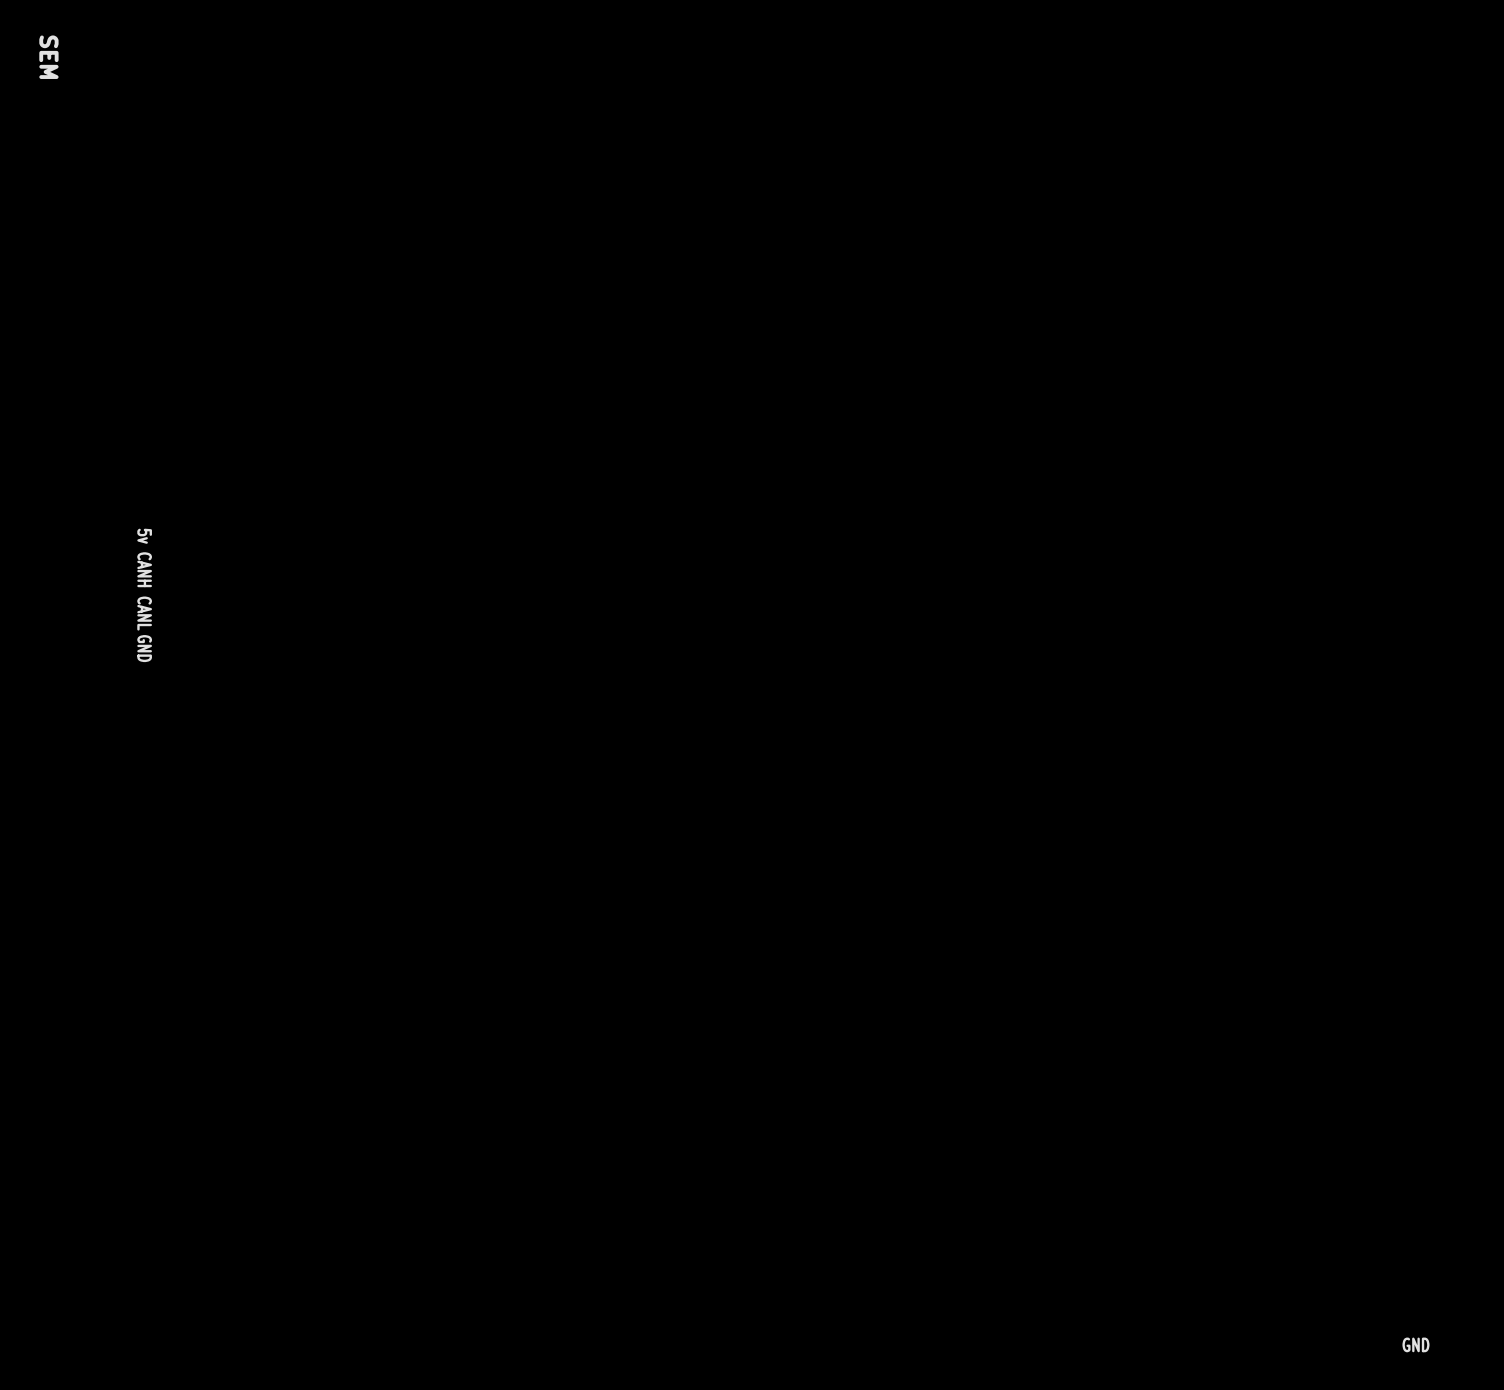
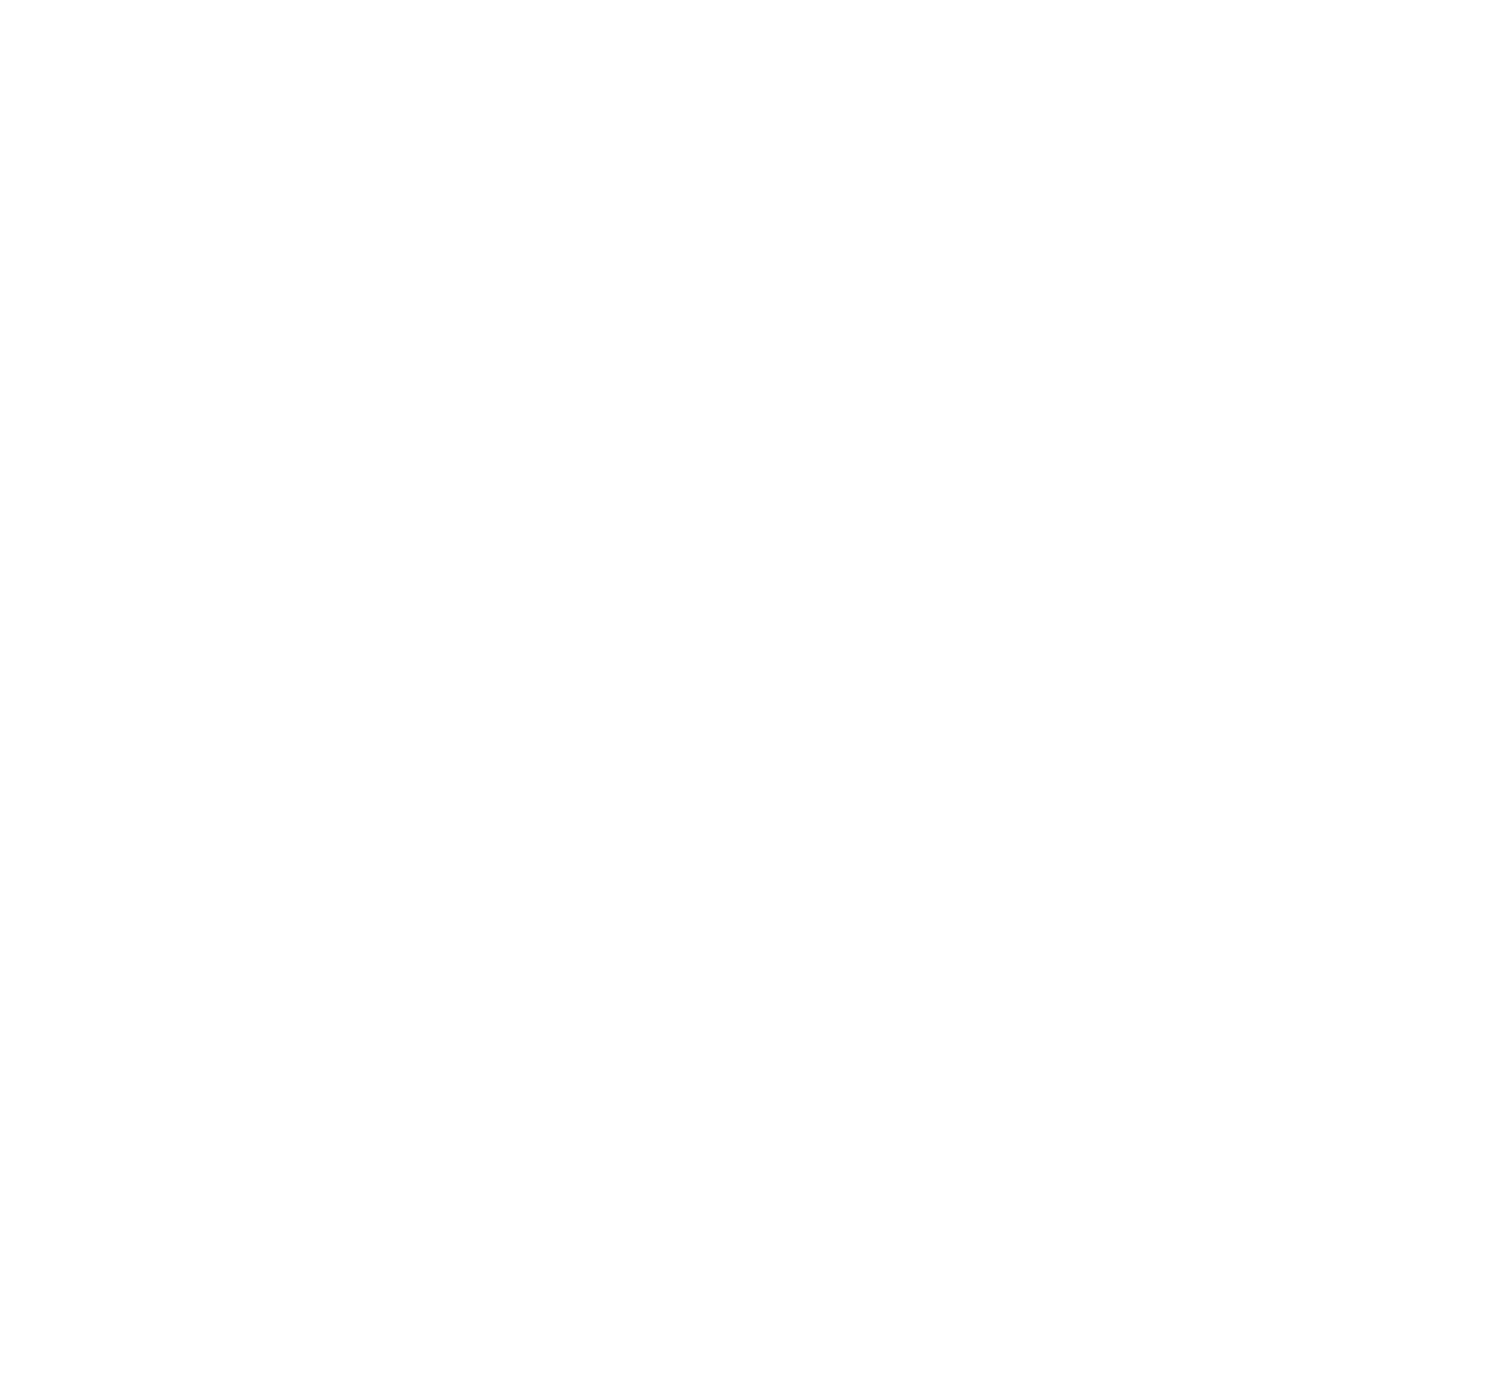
text: SEM (48, 57) -> none
text: 5v (144, 536) -> none
text: CANH (144, 569) -> none
text: CANL (144, 613) -> none
text: GND (144, 648) -> none
text: GND (1415, 1344) -> none

